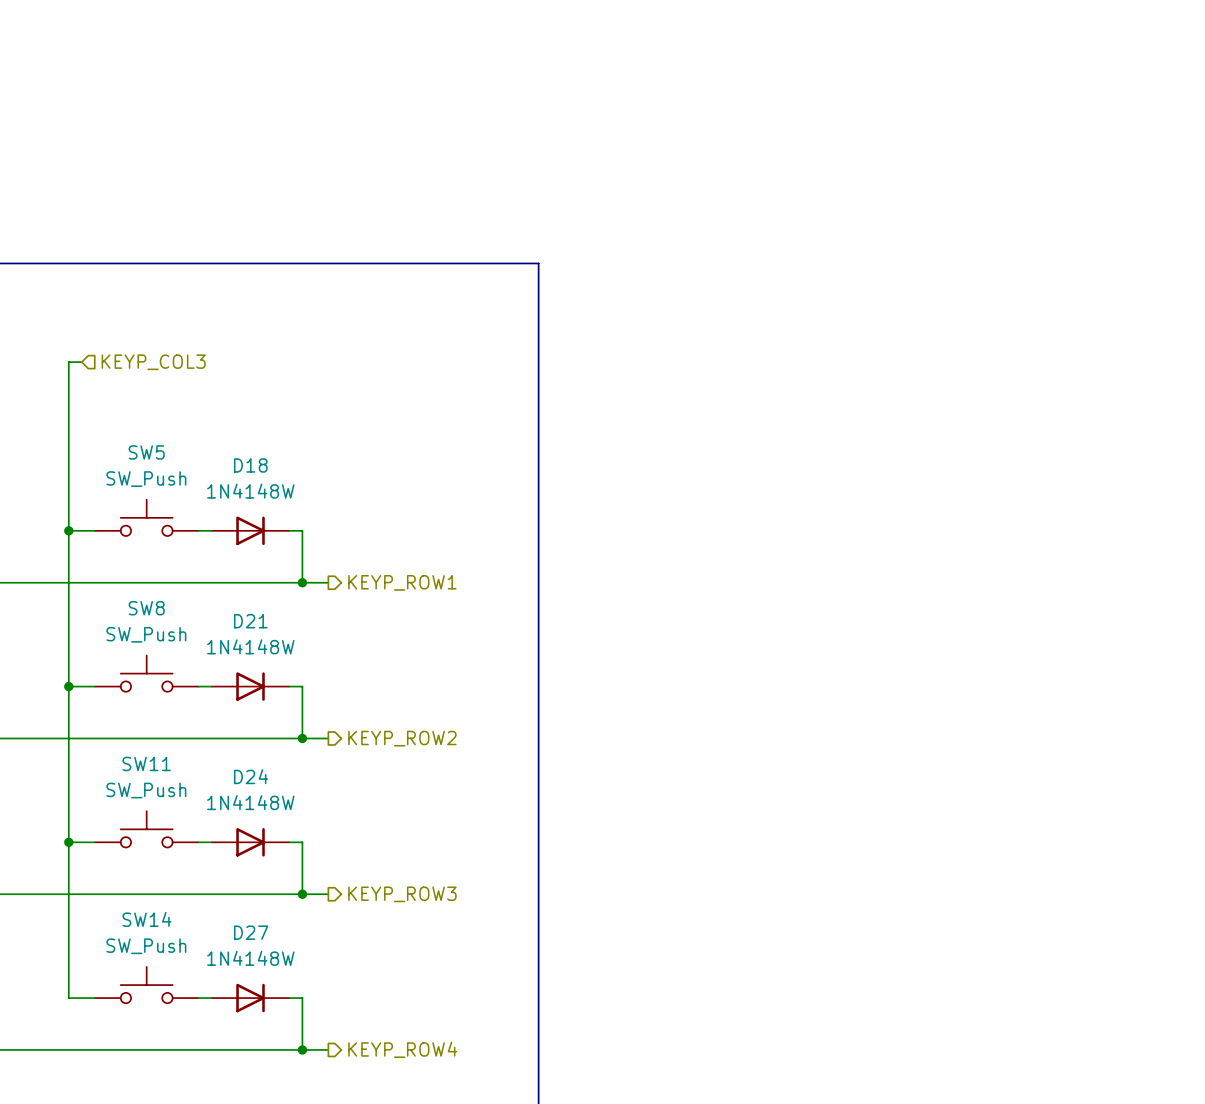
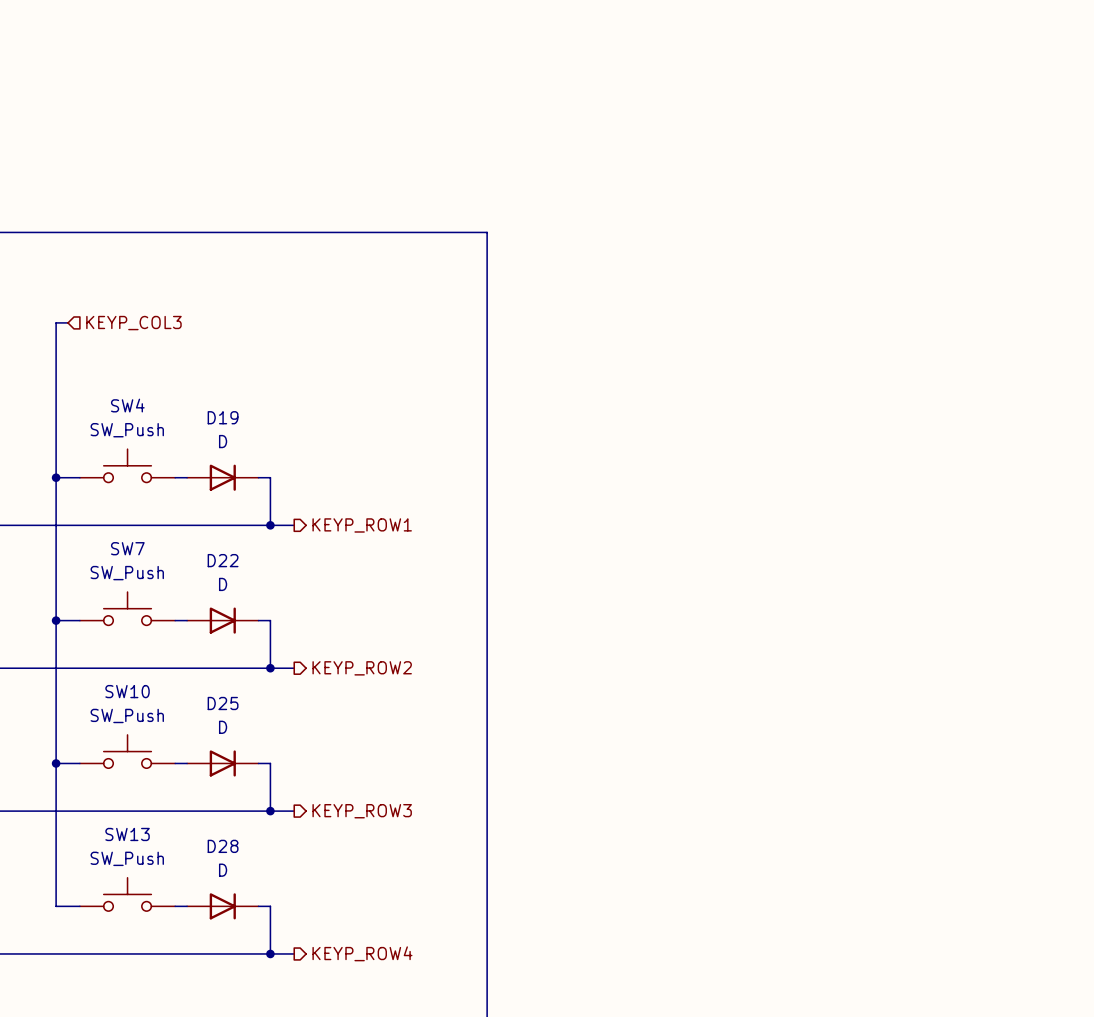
SW5 name: SW5 (146, 452) -> SW4 (127, 405)
D18 name: D18 (250, 465) -> D19 (223, 417)
D18 value: 1N4148W (250, 491) -> D (223, 441)
SW8 name: SW8 (146, 608) -> SW7 (127, 548)
D21 name: D21 (250, 621) -> D22 (223, 560)
D21 value: 1N4148W (250, 646) -> D (223, 584)
SW11 name: SW11 (146, 763) -> SW10 (127, 691)
D24 name: D24 (251, 776) -> D25 (223, 703)
D24 value: 1N4148W (250, 802) -> D (223, 727)
SW14 name: SW14 (146, 919) -> SW13 (127, 834)
D27 name: D27 (251, 932) -> D28 (223, 846)
D27 value: 1N4148W (250, 958) -> D (223, 870)

